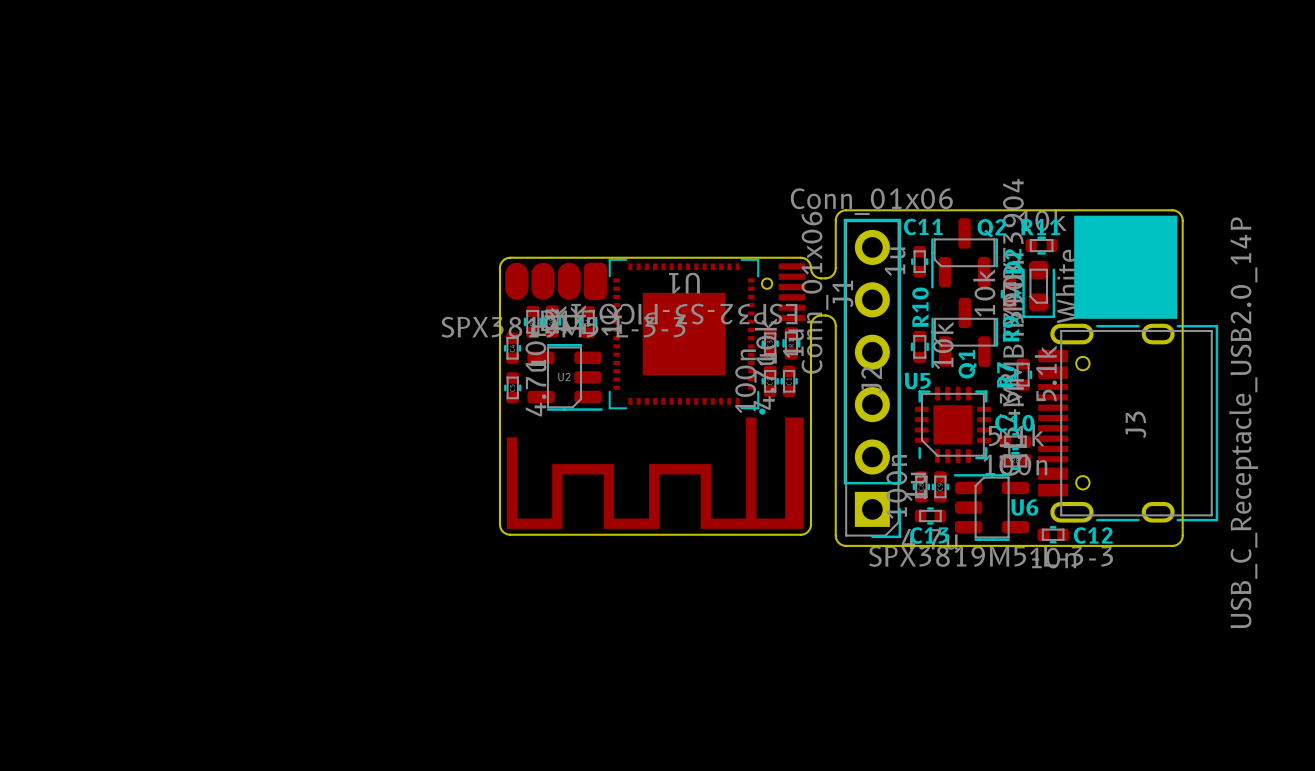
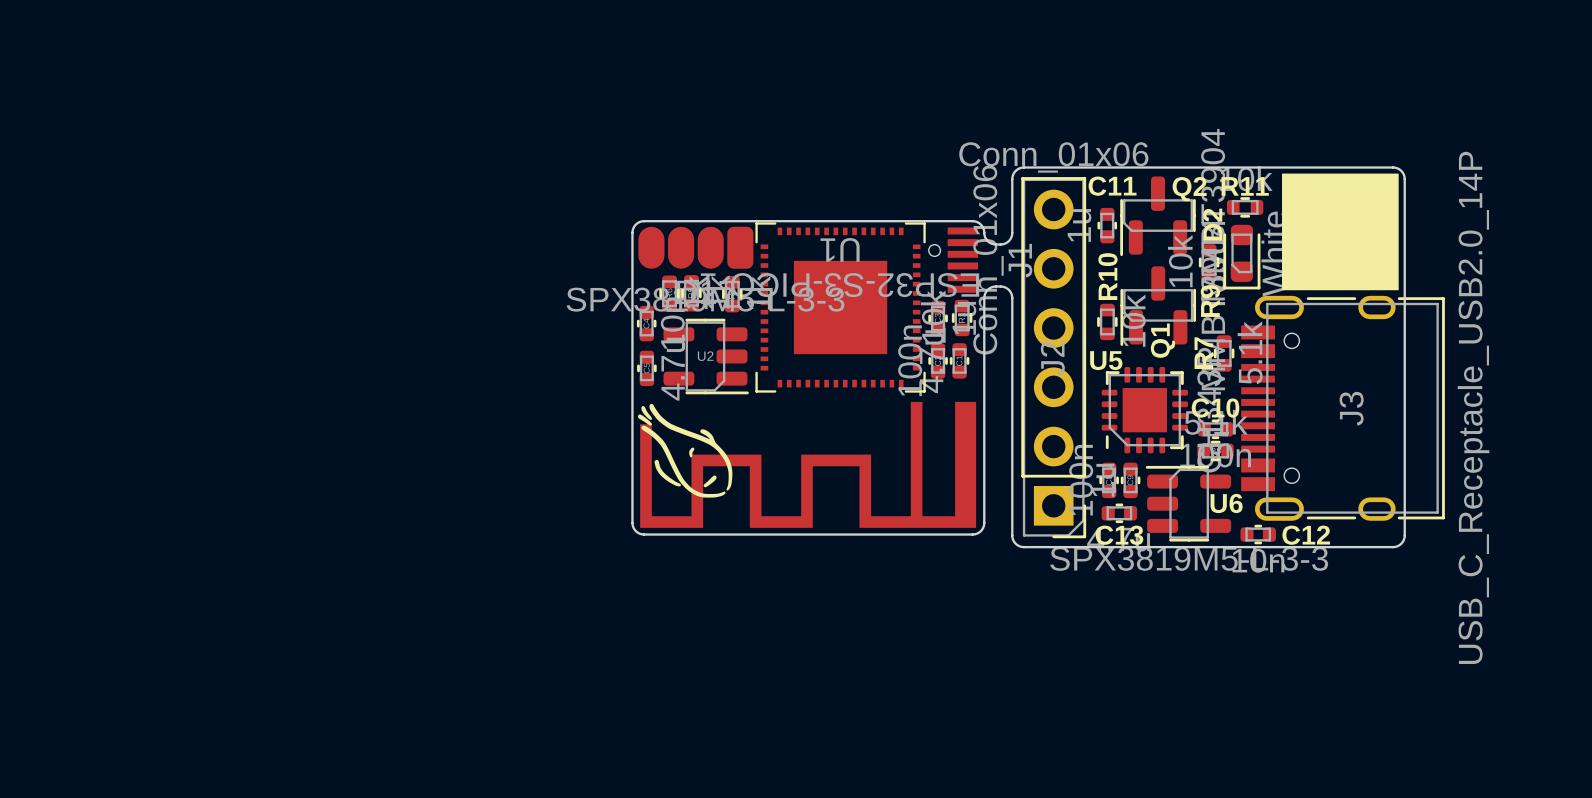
drawing: [759, 408, 766, 415] -> none
drawing: none -> [637, 403, 733, 498]

